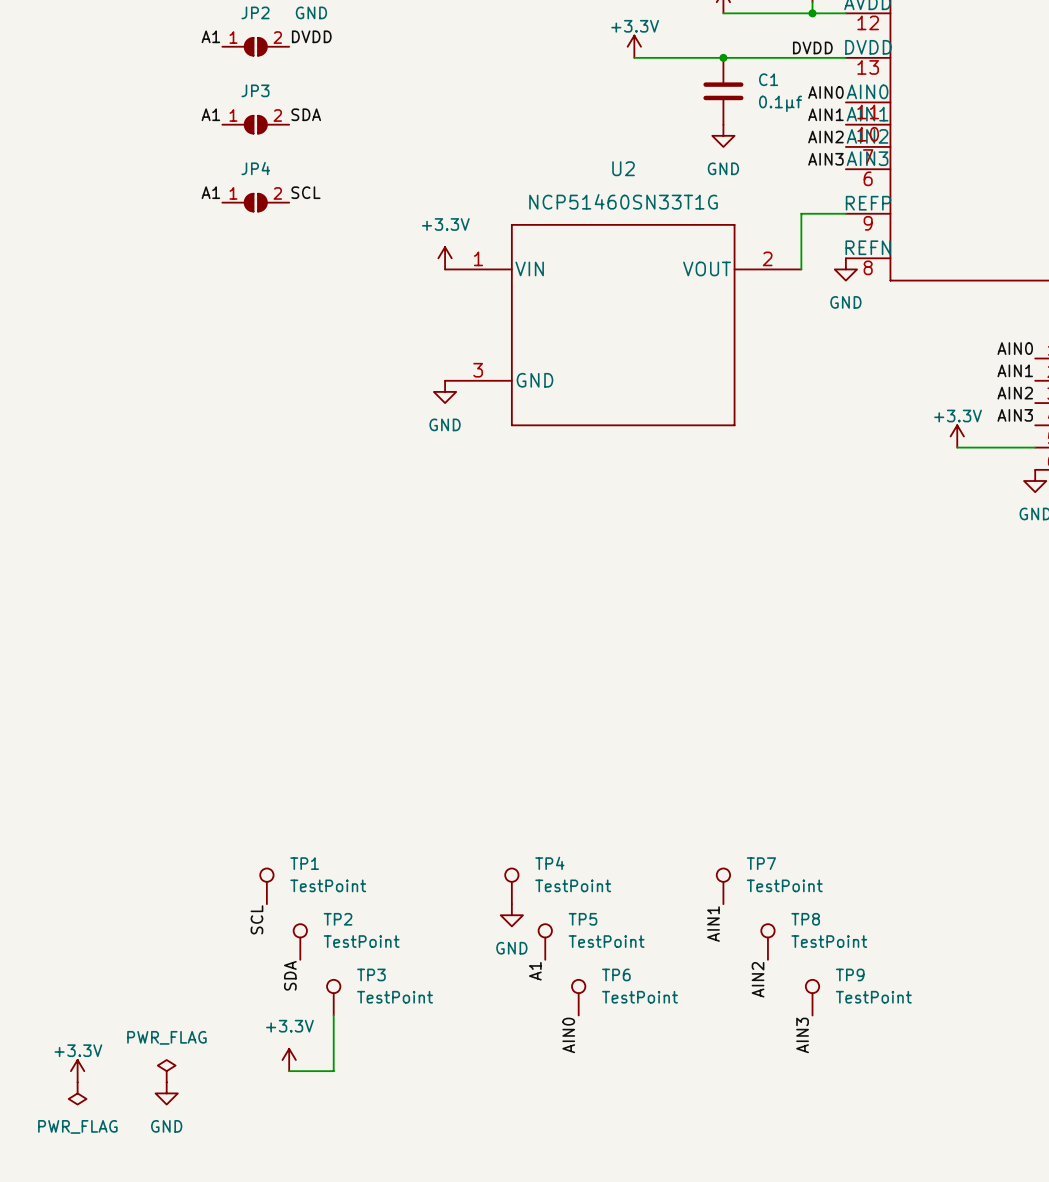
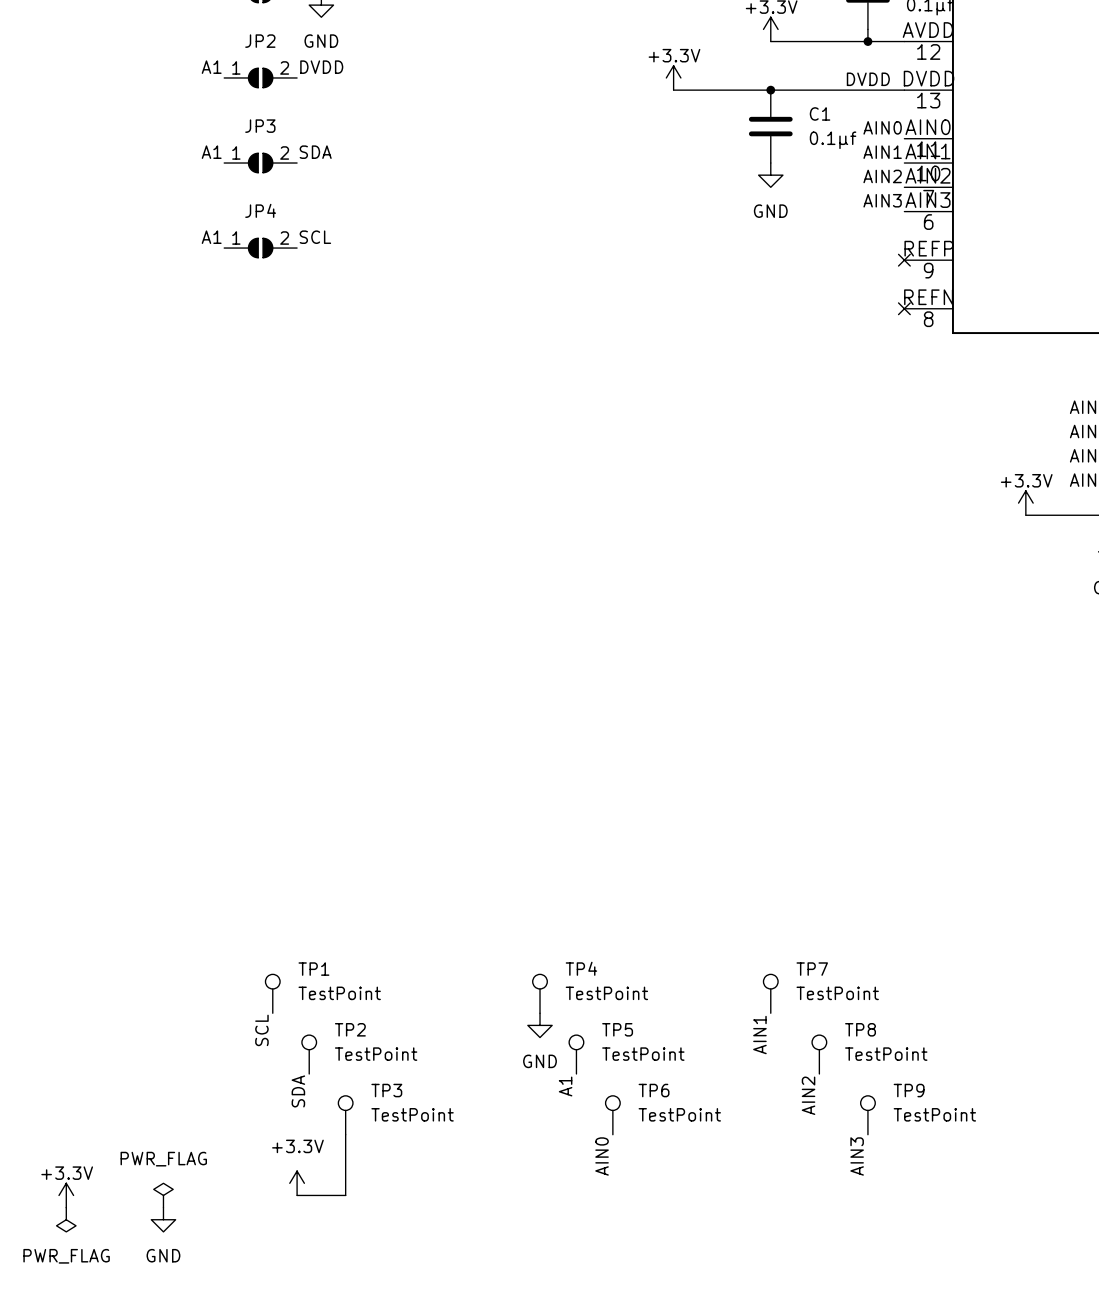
wire: (845, 213) (801, 213) (801, 269) -> none
no-connect mark: none -> (904, 260)
power symbol: +3.3V (445, 258) -> none
no-connect mark: none -> (904, 308)
power symbol: GND (845, 269) -> none
U2: NCP51460SN33T1G (623, 325) -> none
power symbol: GND (445, 391) -> none

